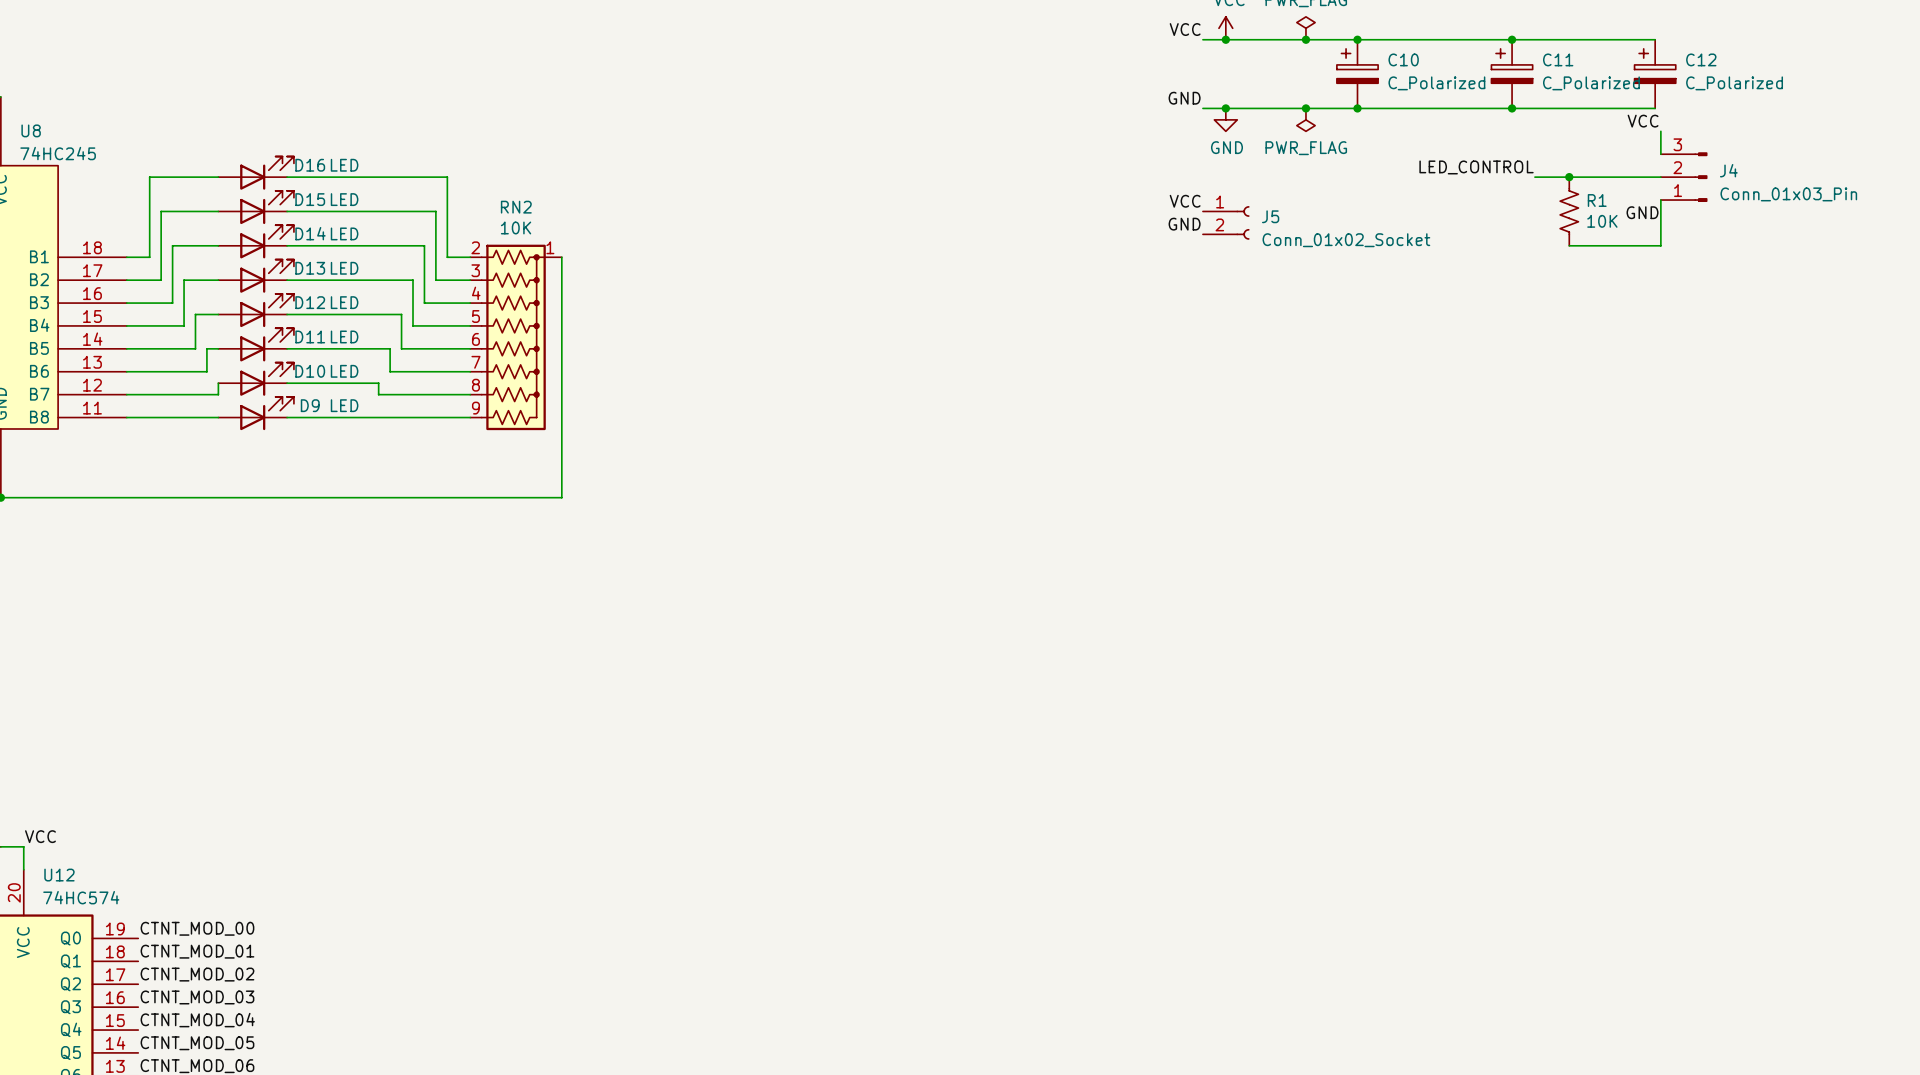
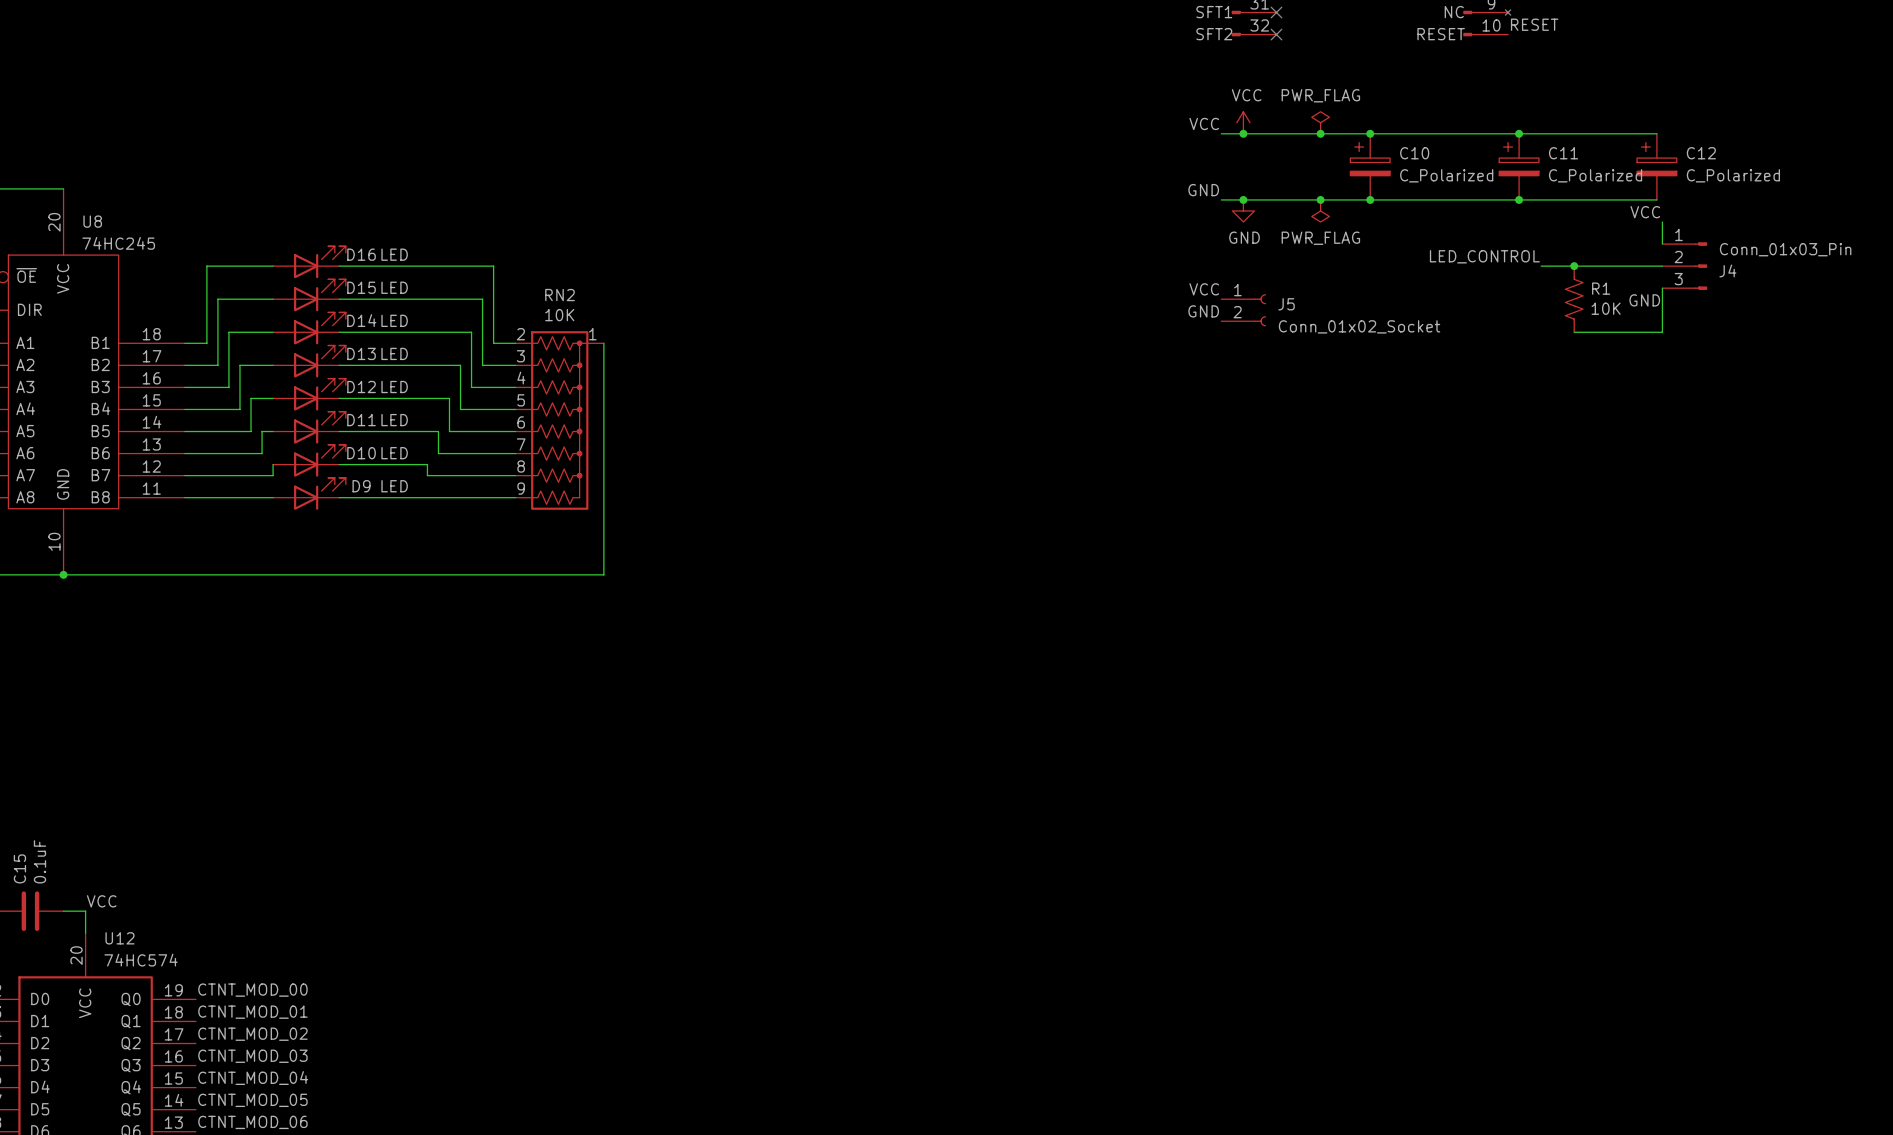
J4 flip: as is (1700, 177) -> up-down (1701, 266)

